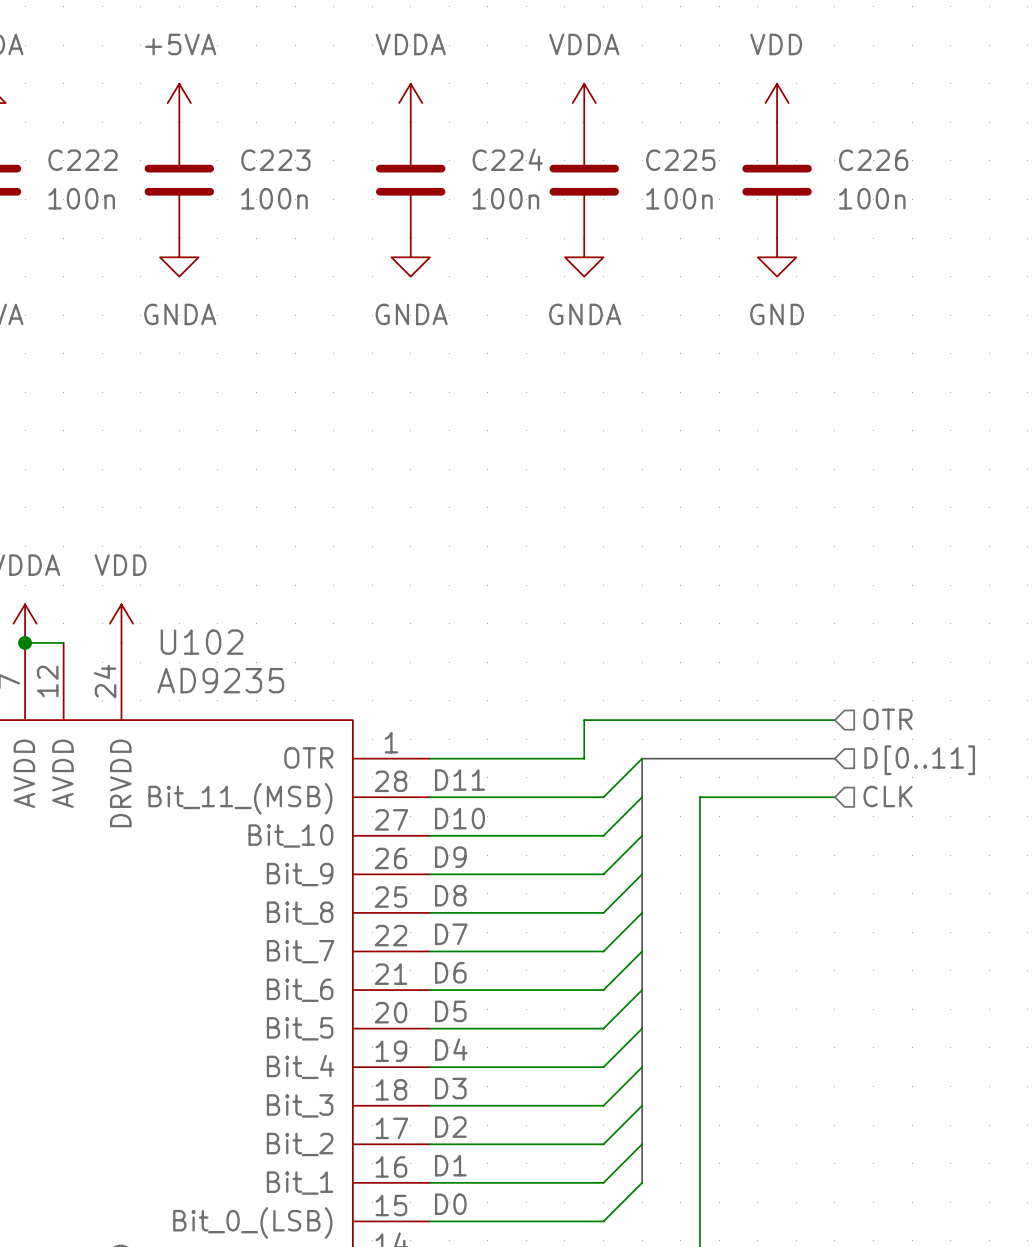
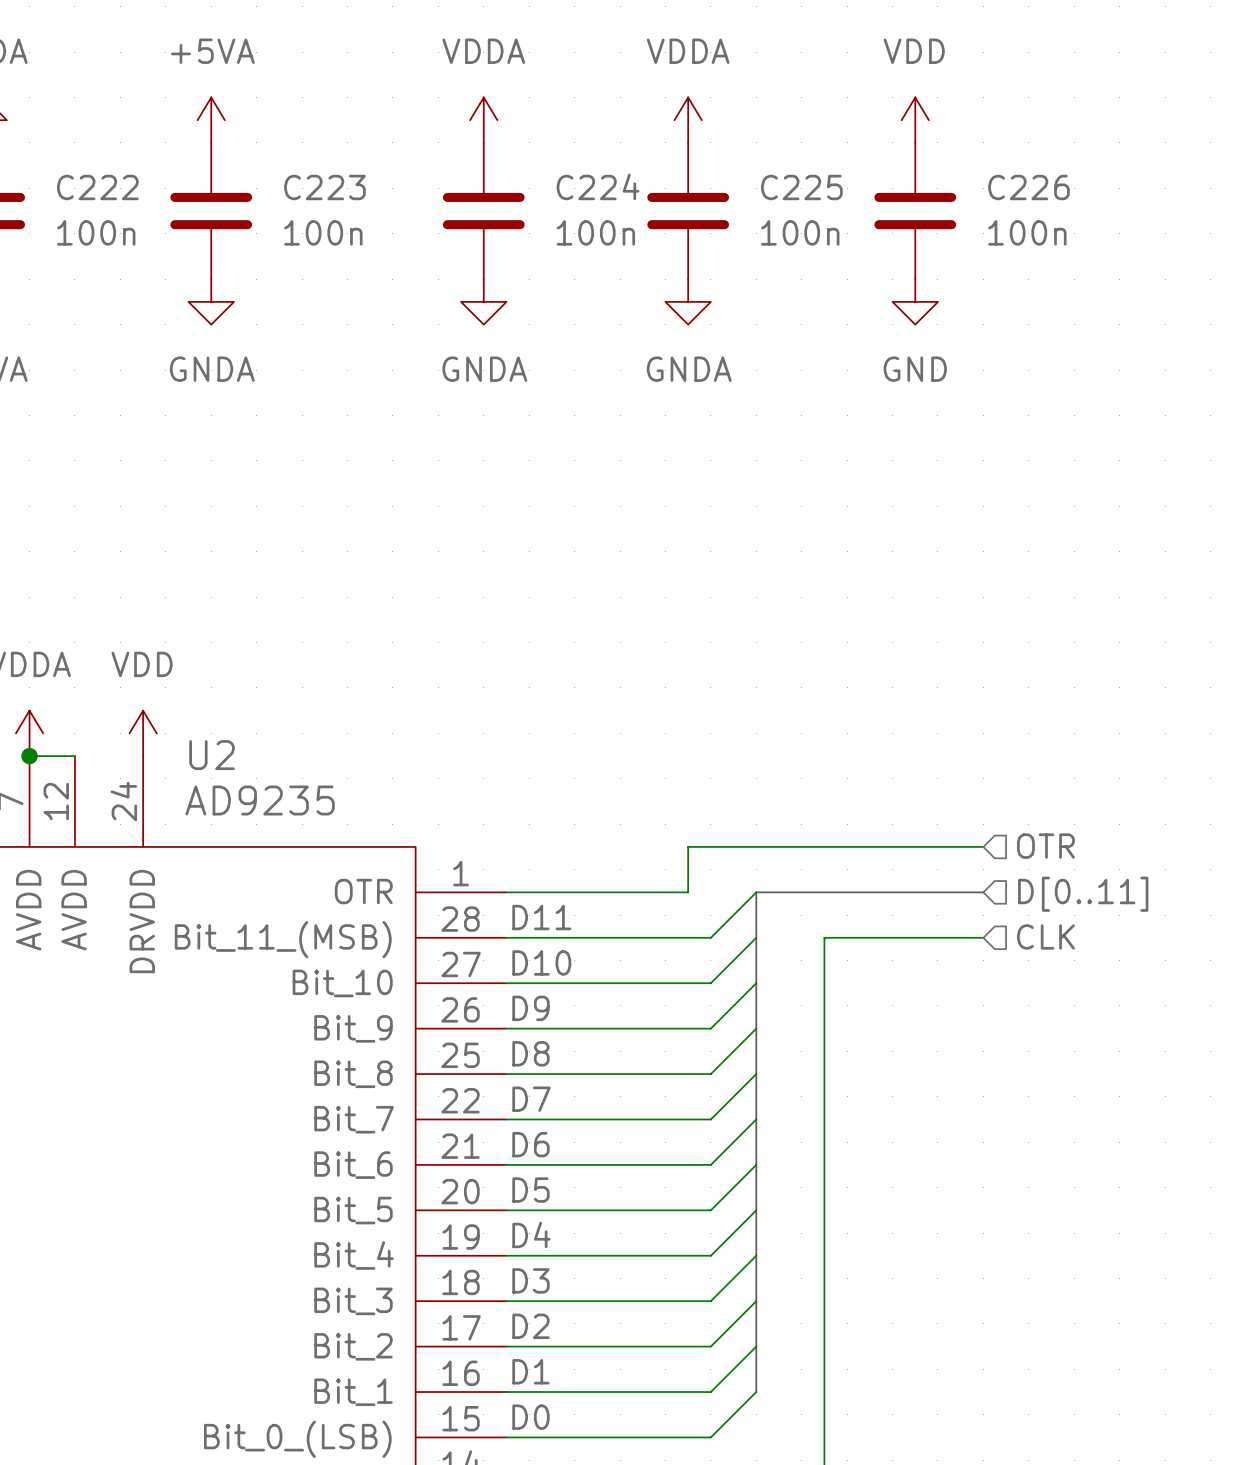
U102 name: U102 (202, 642) -> U2 (212, 755)

